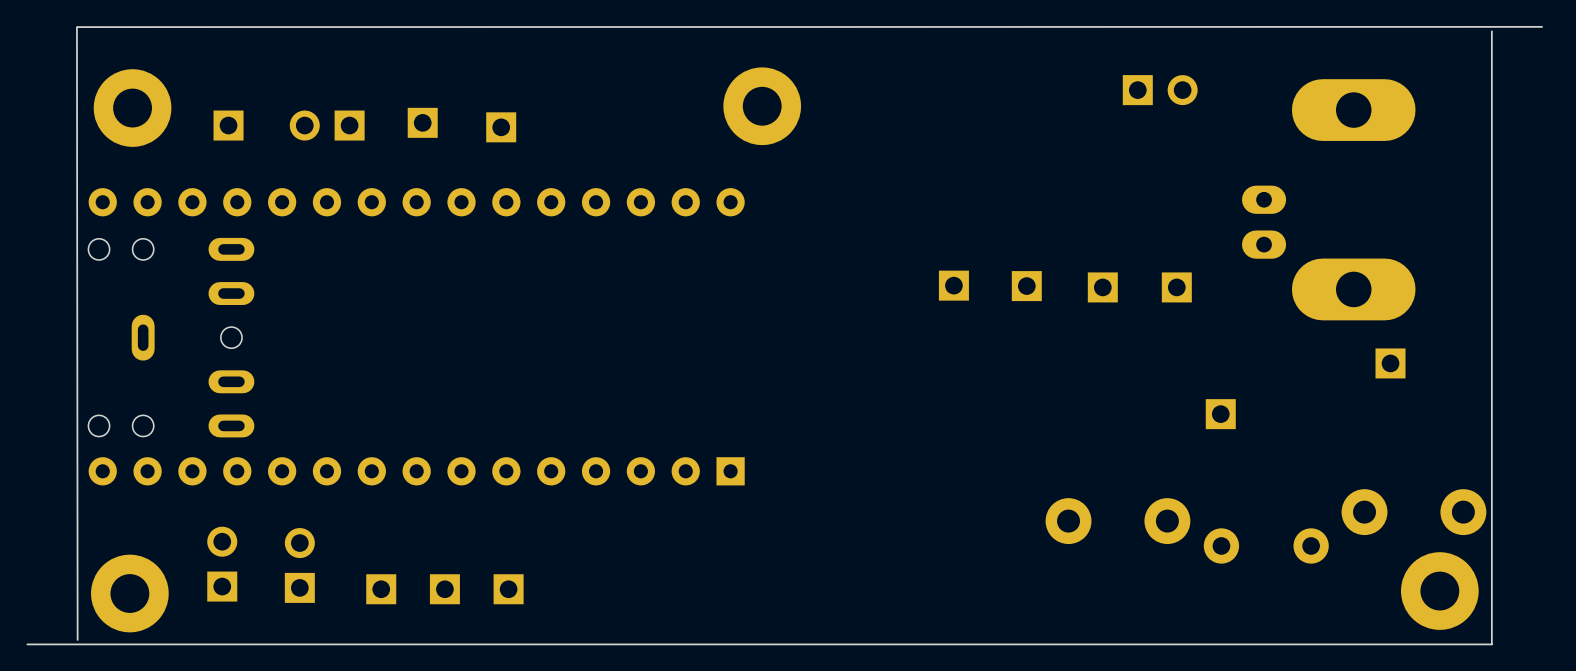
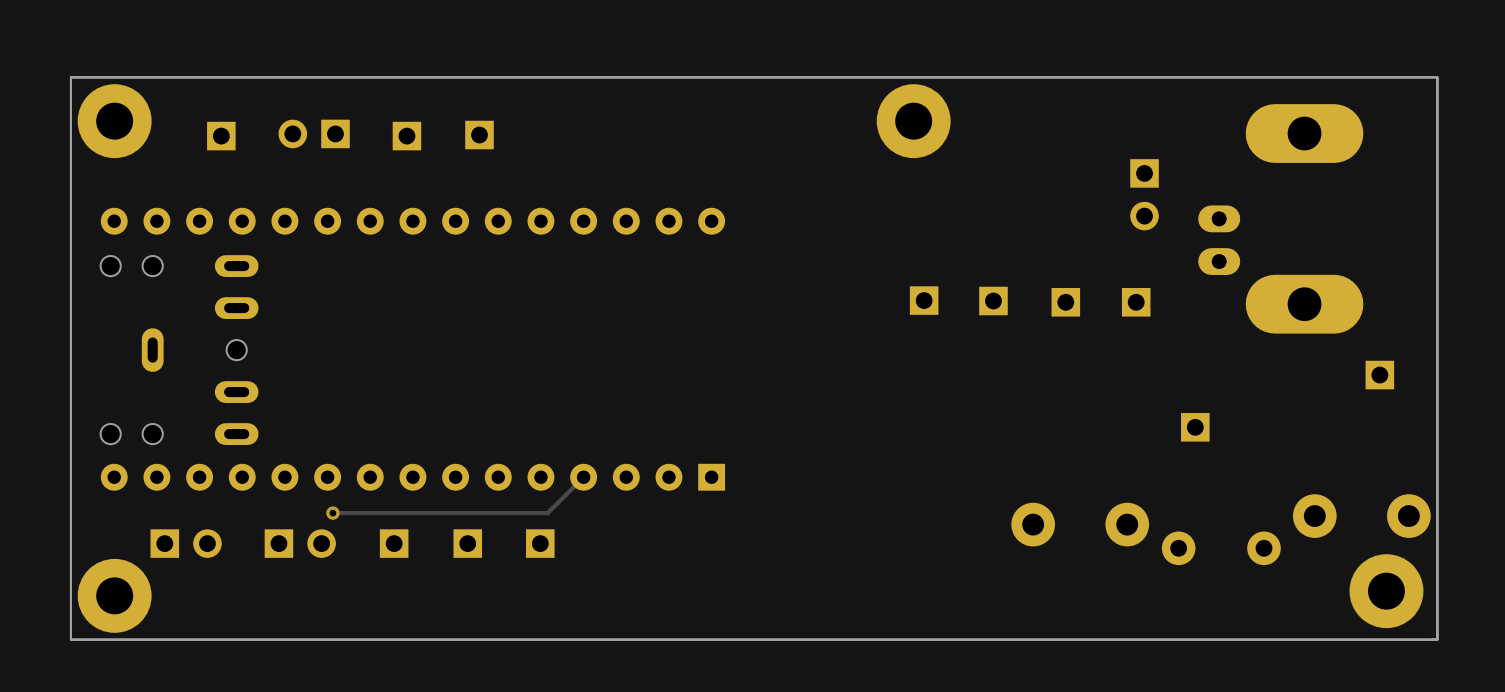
board edge: (1542, 26) (77, 27) -> none
board edge: (76, 27) (77, 639) -> none
board edge: (1491, 31) (1491, 644) (27, 644) -> none
board edge: none -> (1437, 77) (70, 77) (70, 639) (1437, 639) (1437, 77)
part rotation: 0° (1160, 90) -> 90° clockwise (1144, 194)
part position: (1160, 90) -> (1144, 194)
part position: (762, 106) -> (913, 121)
part position: (132, 108) -> (114, 121)
part position: (422, 122) -> (406, 136)
part position: (228, 125) -> (221, 136)
part position: (327, 125) -> (314, 133)
part position: (501, 127) -> (479, 135)
part position: (1390, 363) -> (1379, 375)
part position: (1220, 414) -> (1195, 427)
track: none -> (583, 477) (547, 513) (332, 513)
via: none -> (332, 513)
part: none -> (186, 543)
part: none -> (394, 543)
part: none -> (467, 543)
part: none -> (540, 543)
part: (222, 564) -> none
part rotation: 0° (299, 565) -> 90° clockwise (300, 543)
part: (381, 589) -> none
part: (444, 589) -> none
part: (508, 589) -> none
part position: (129, 593) -> (114, 595)

